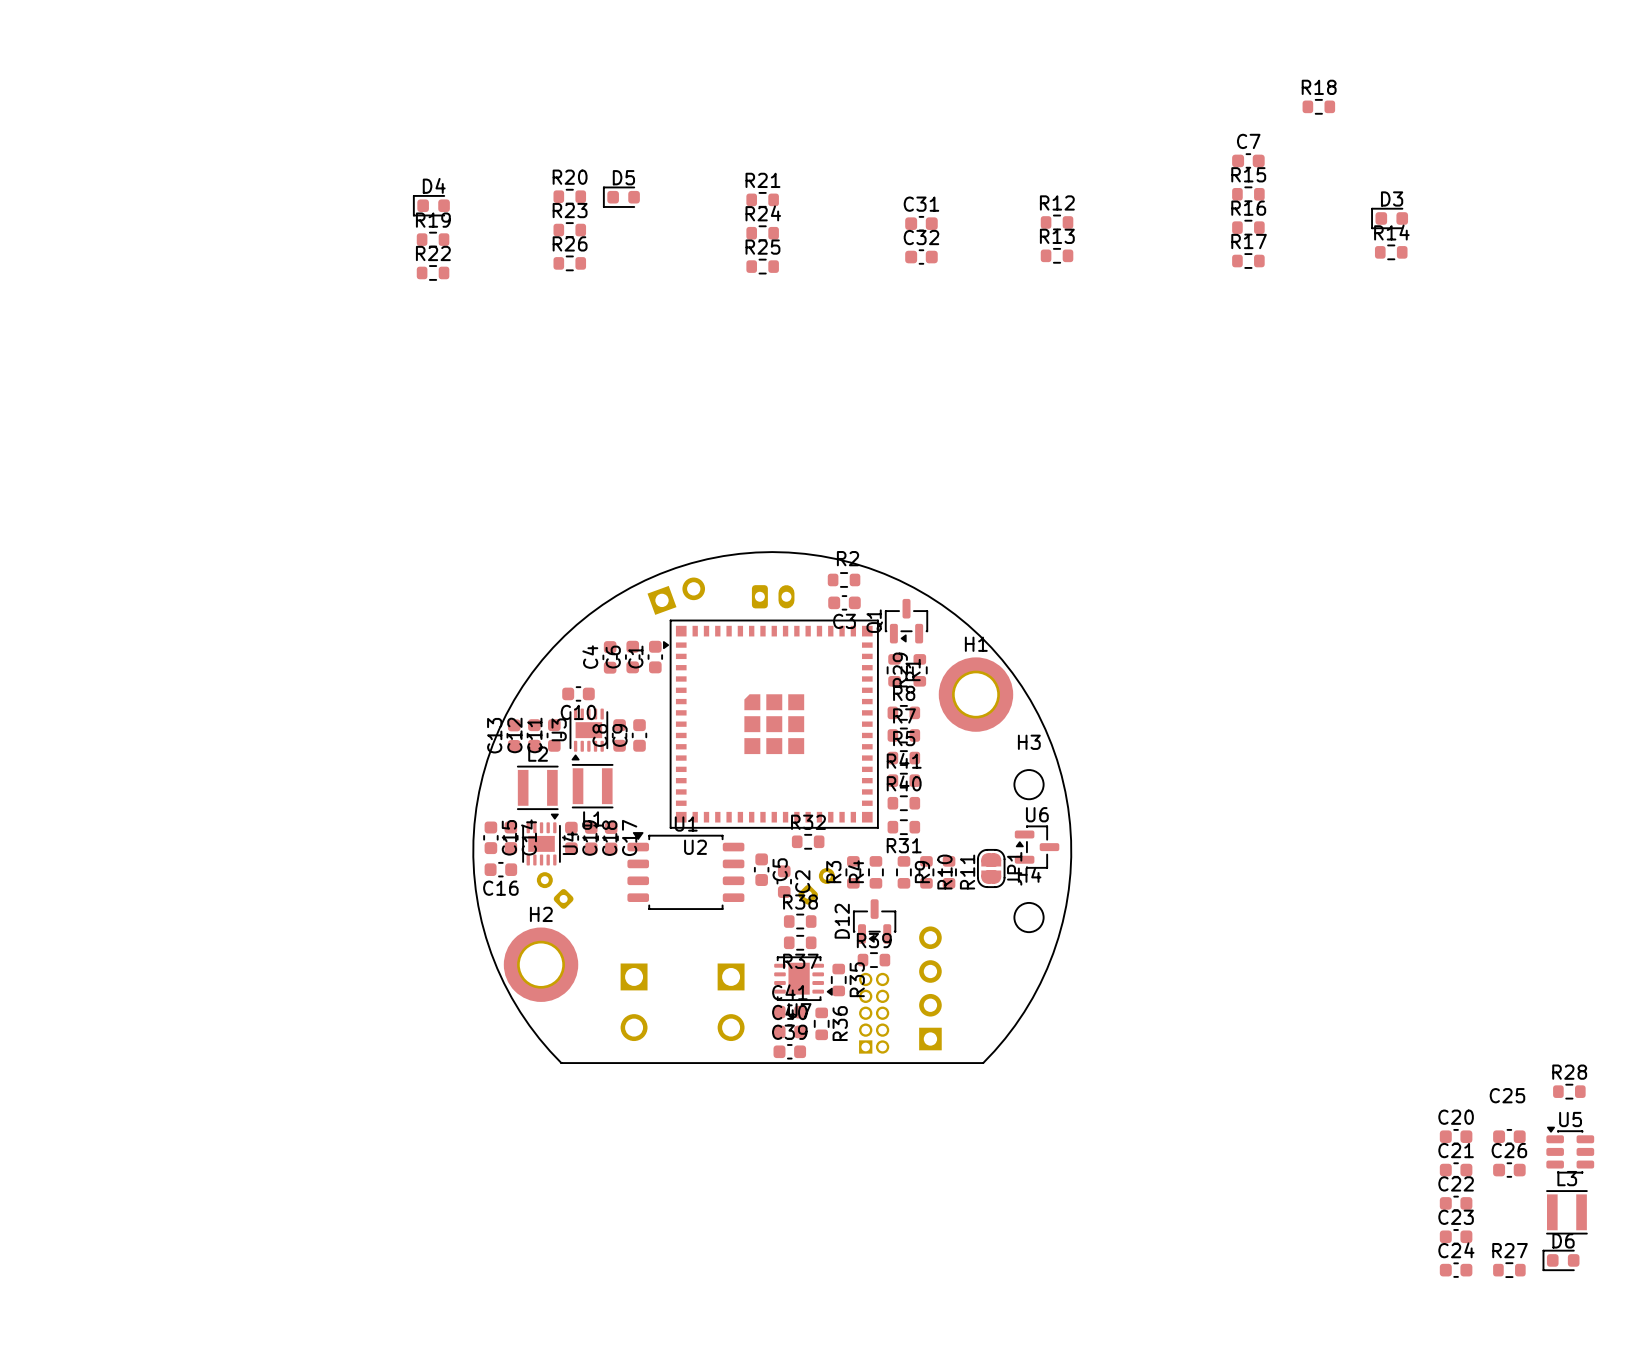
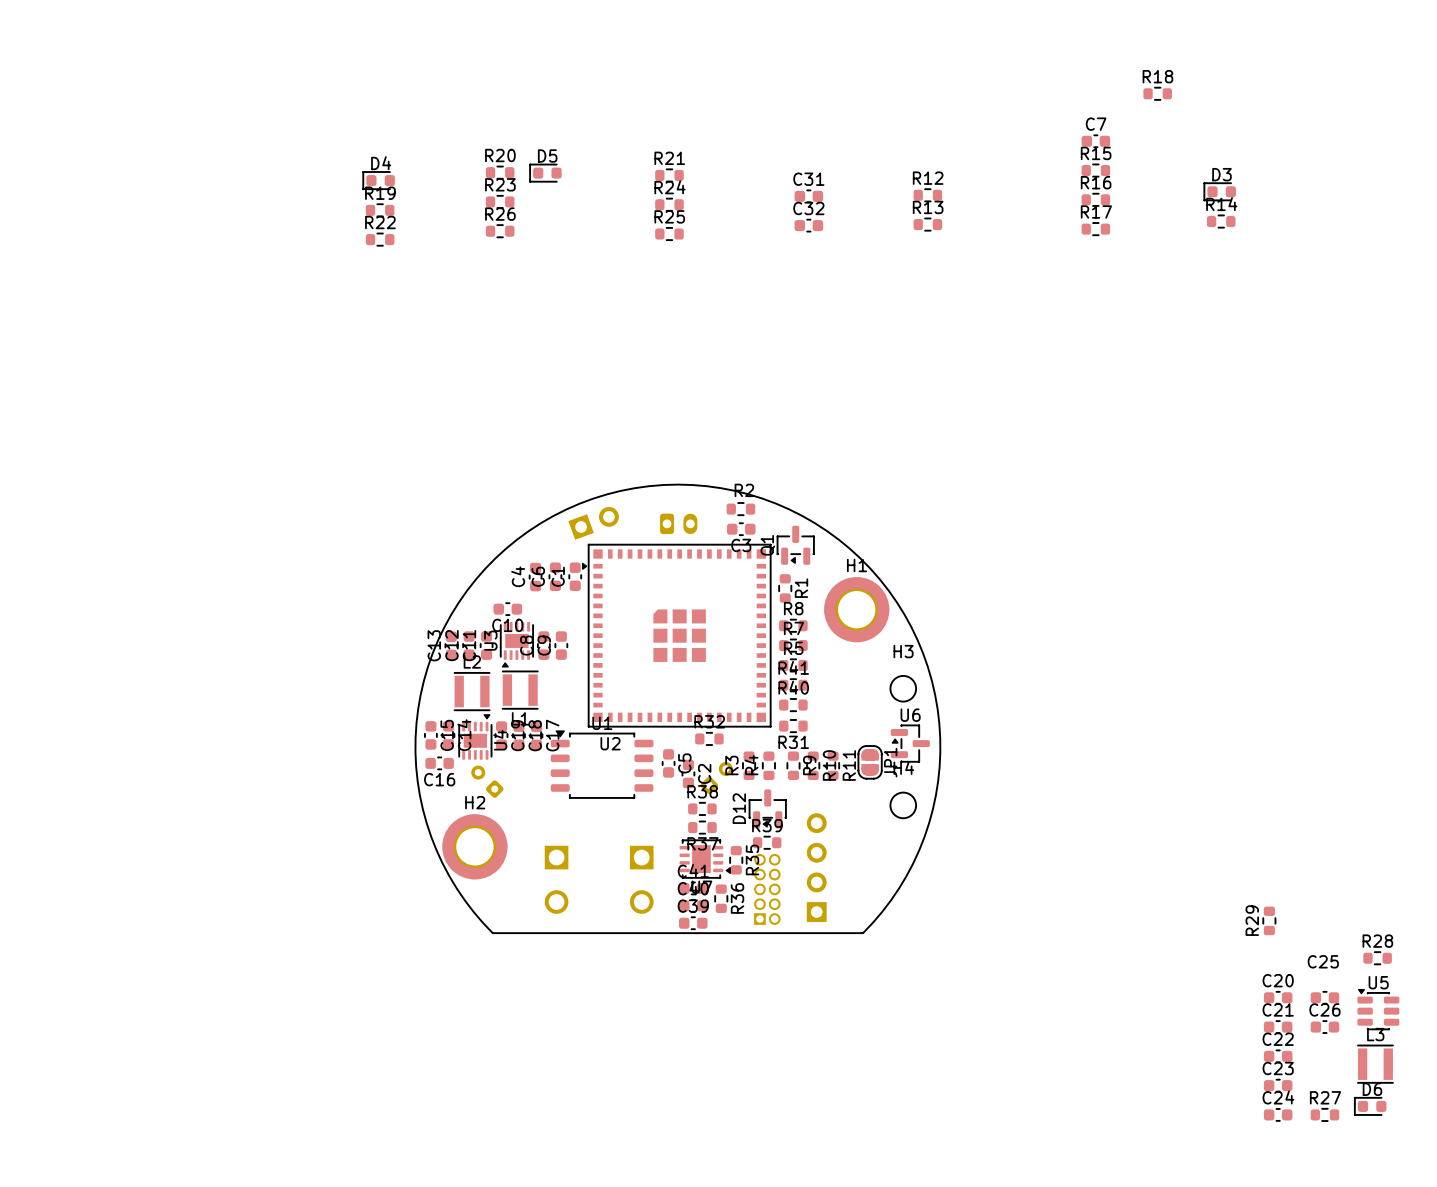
R29 position: (919, 670) -> (1269, 920)

